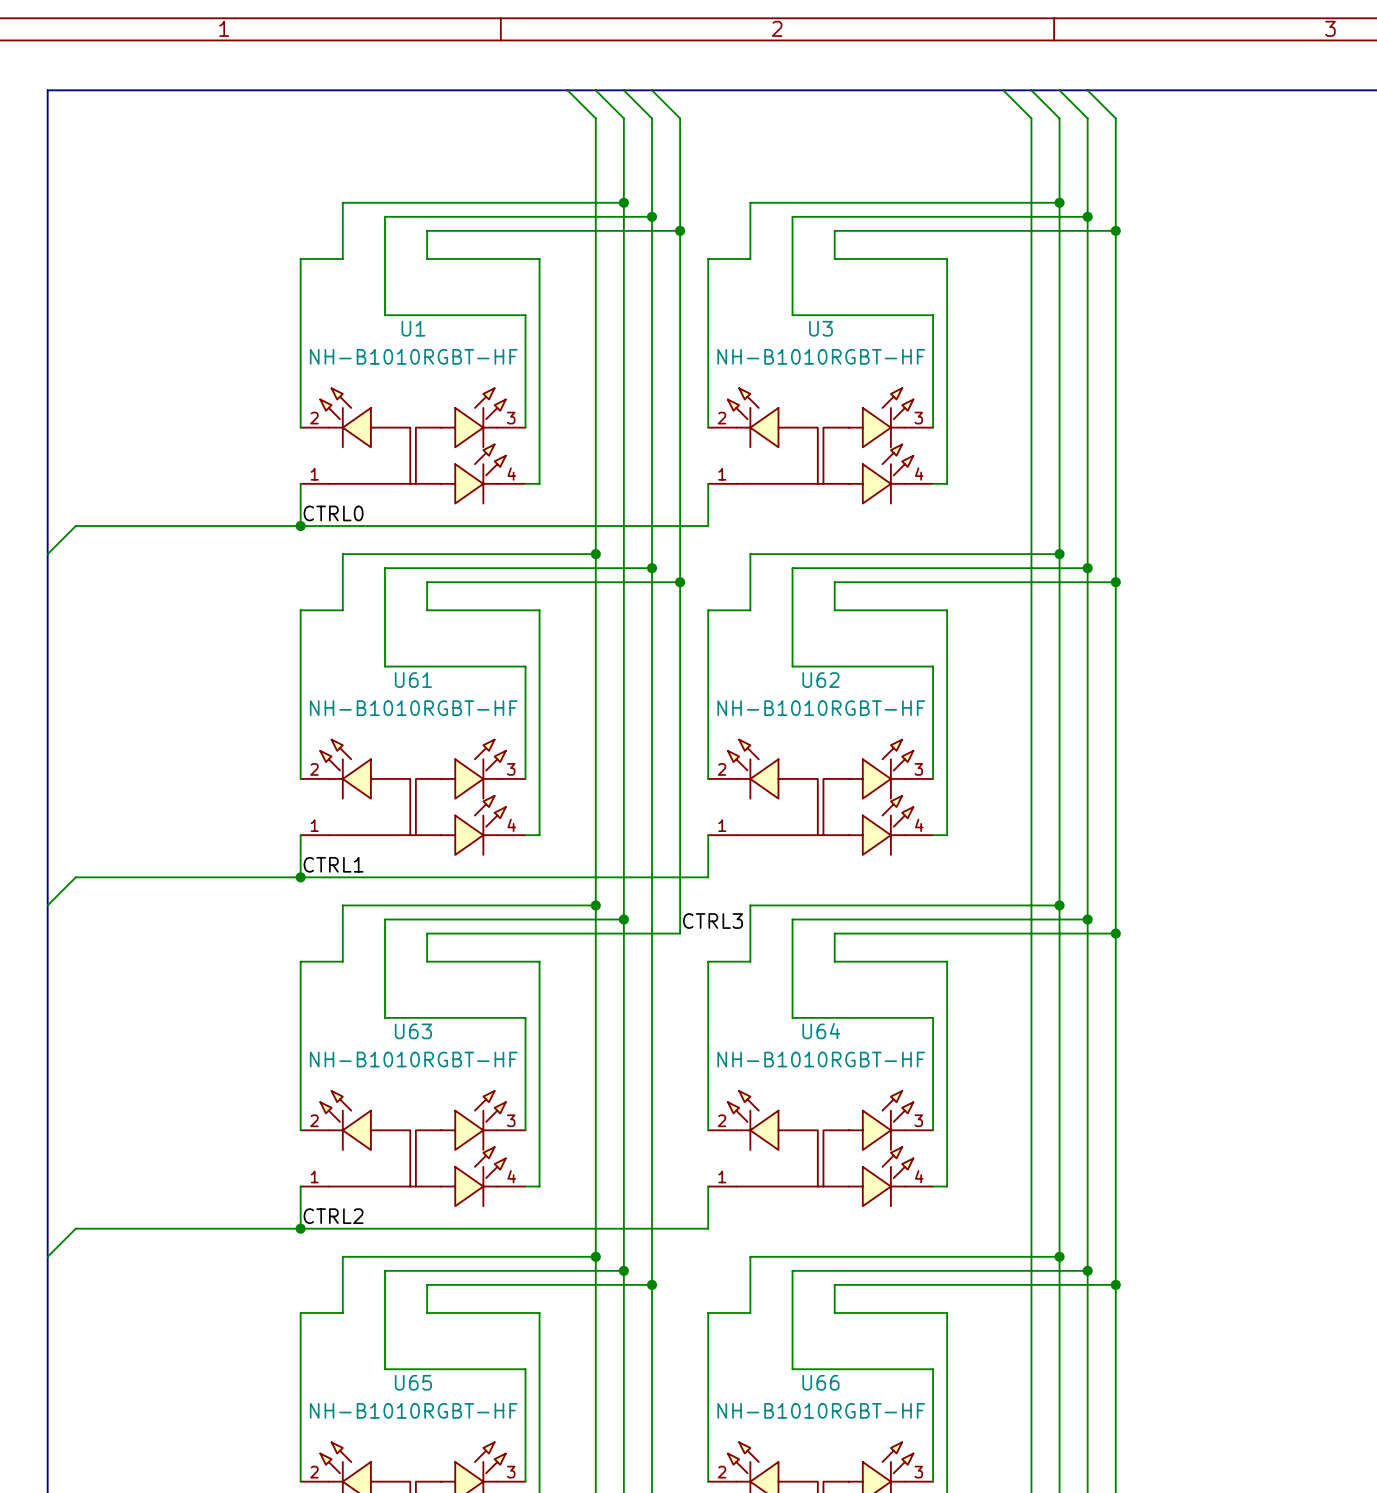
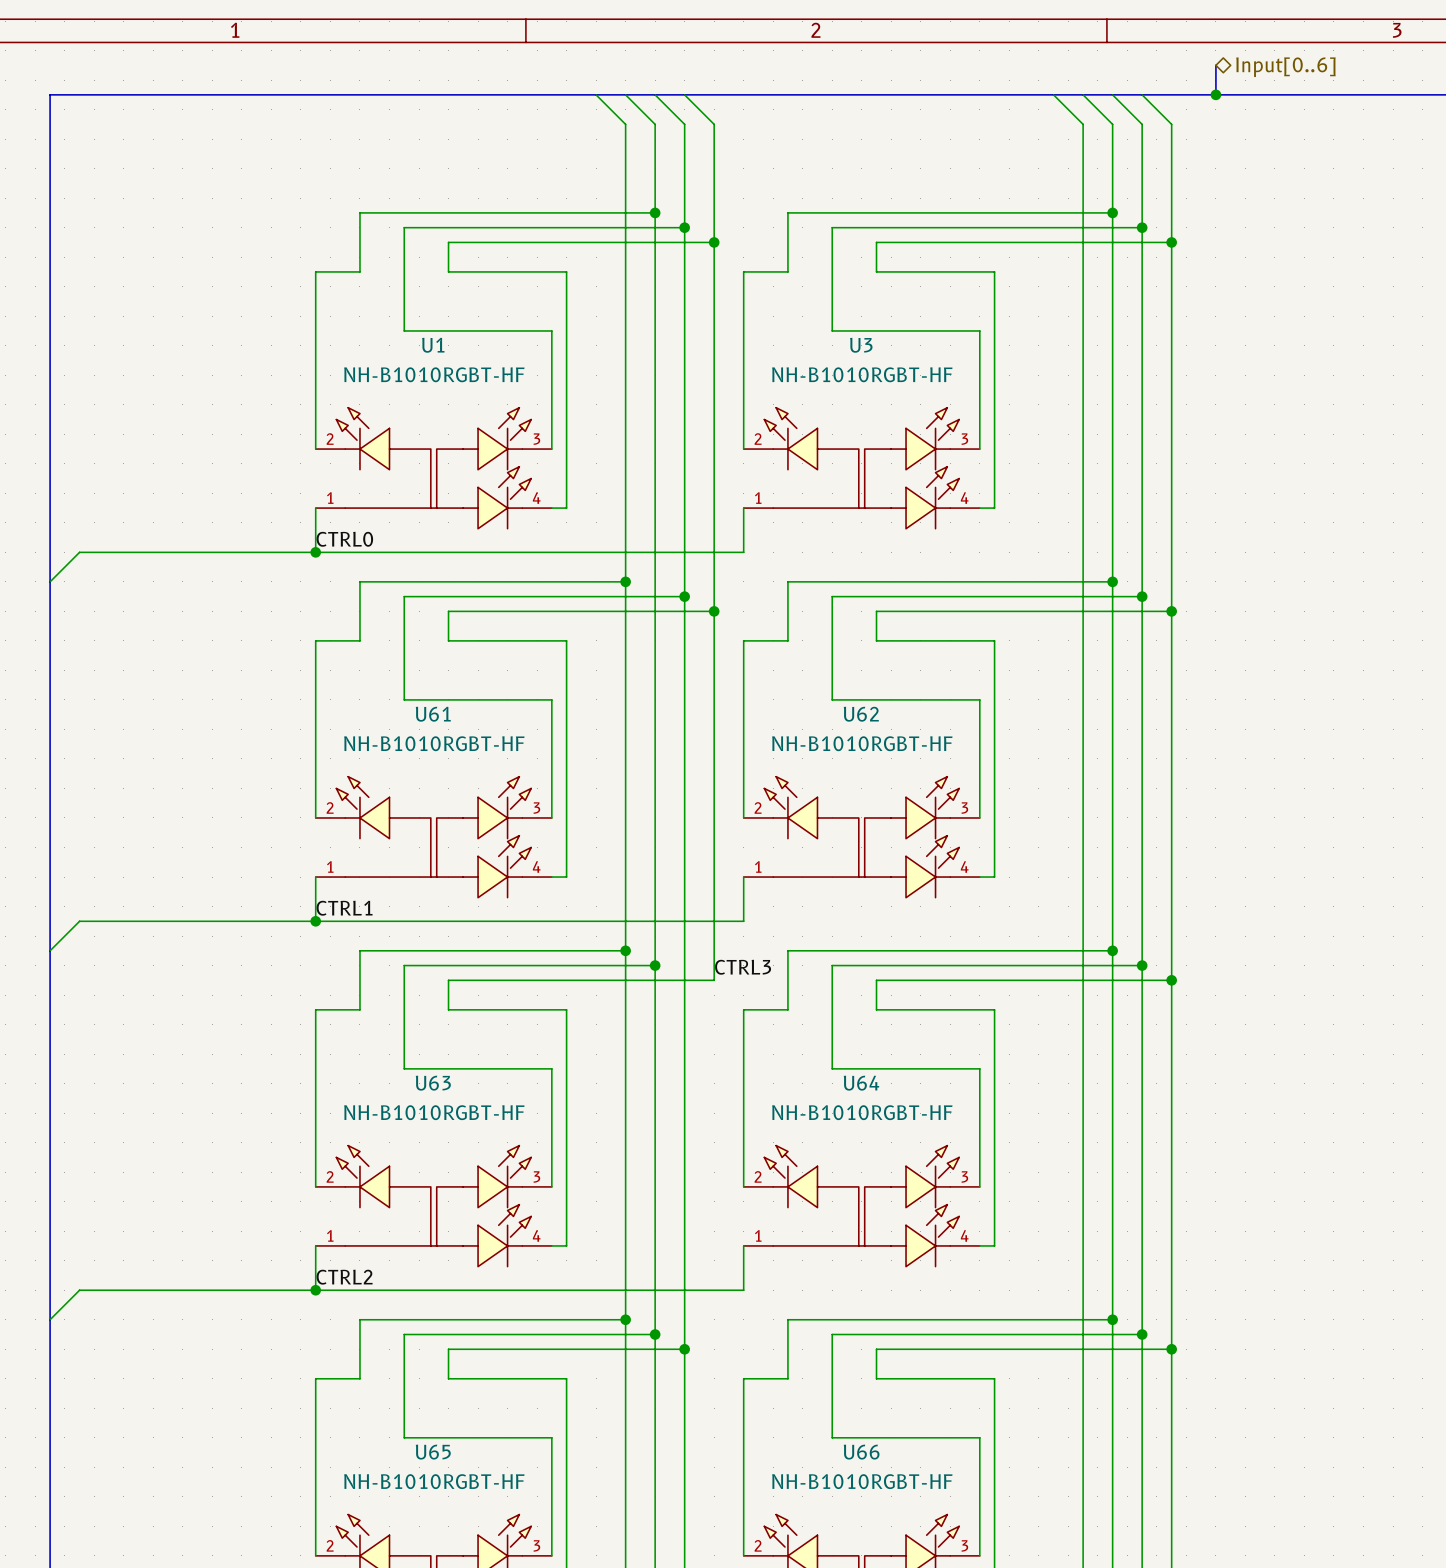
bus: none -> (1215, 65) (1215, 94)
hierarchical label: none -> Input[0..6] (1285, 67)
junction: none -> (1215, 94)

